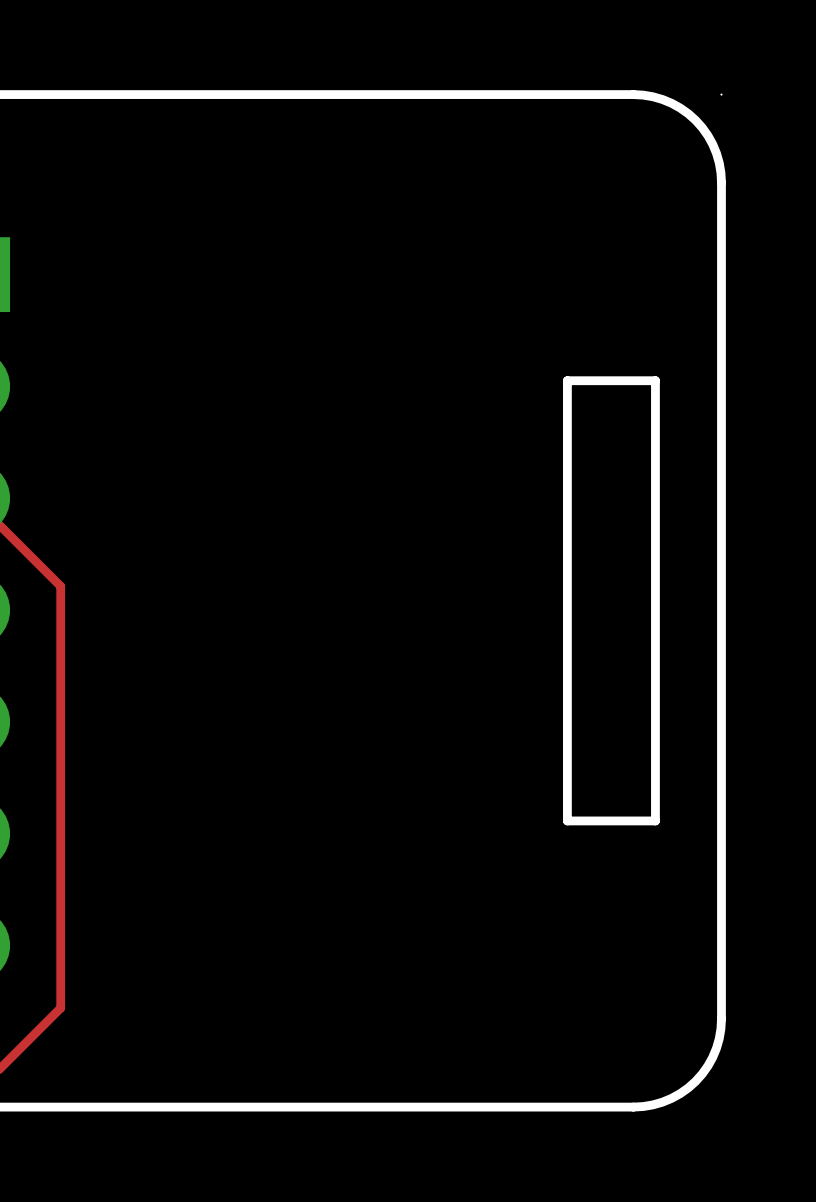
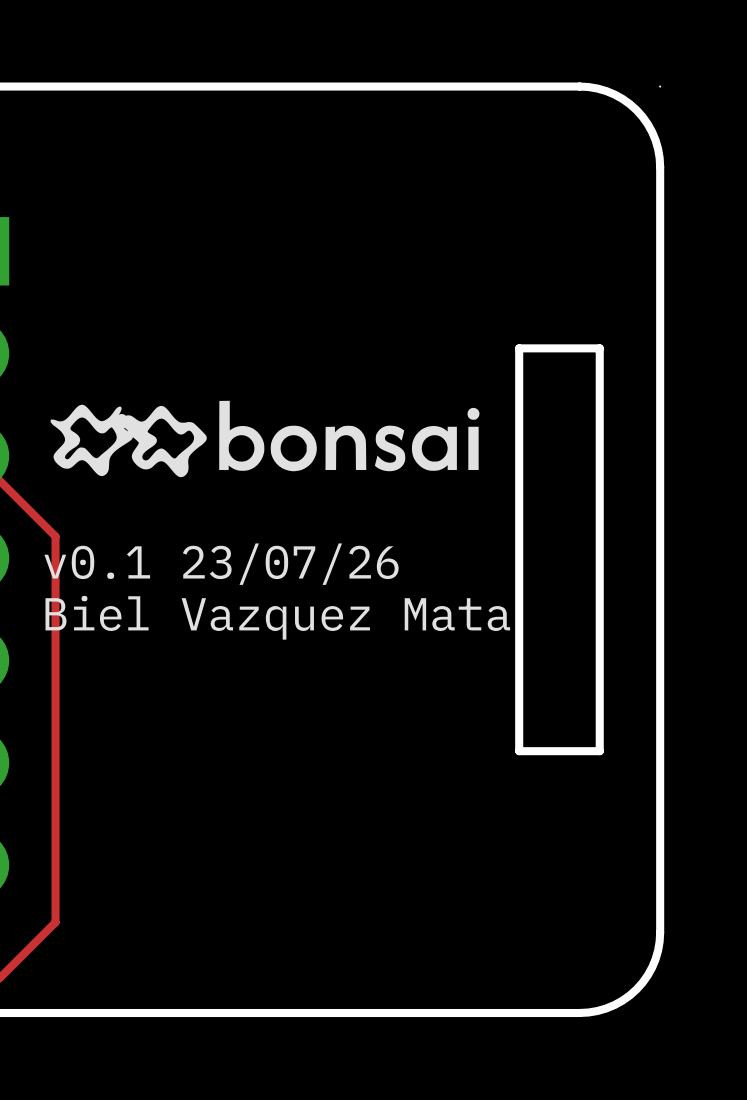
drawing: none -> [50, 400, 480, 478]
text: none -> v0.1 23/07/26 (221, 564)
text: none -> Biel Vazquez Mata (277, 617)

